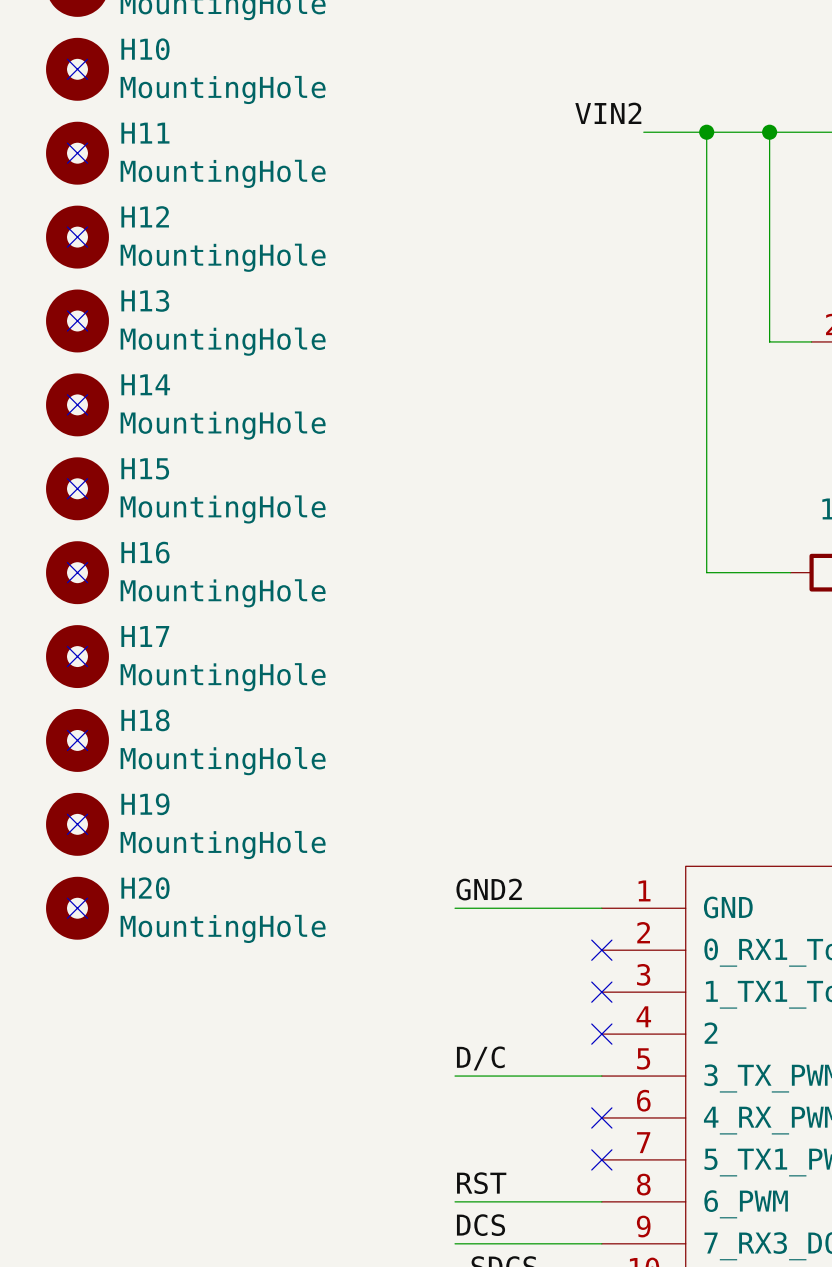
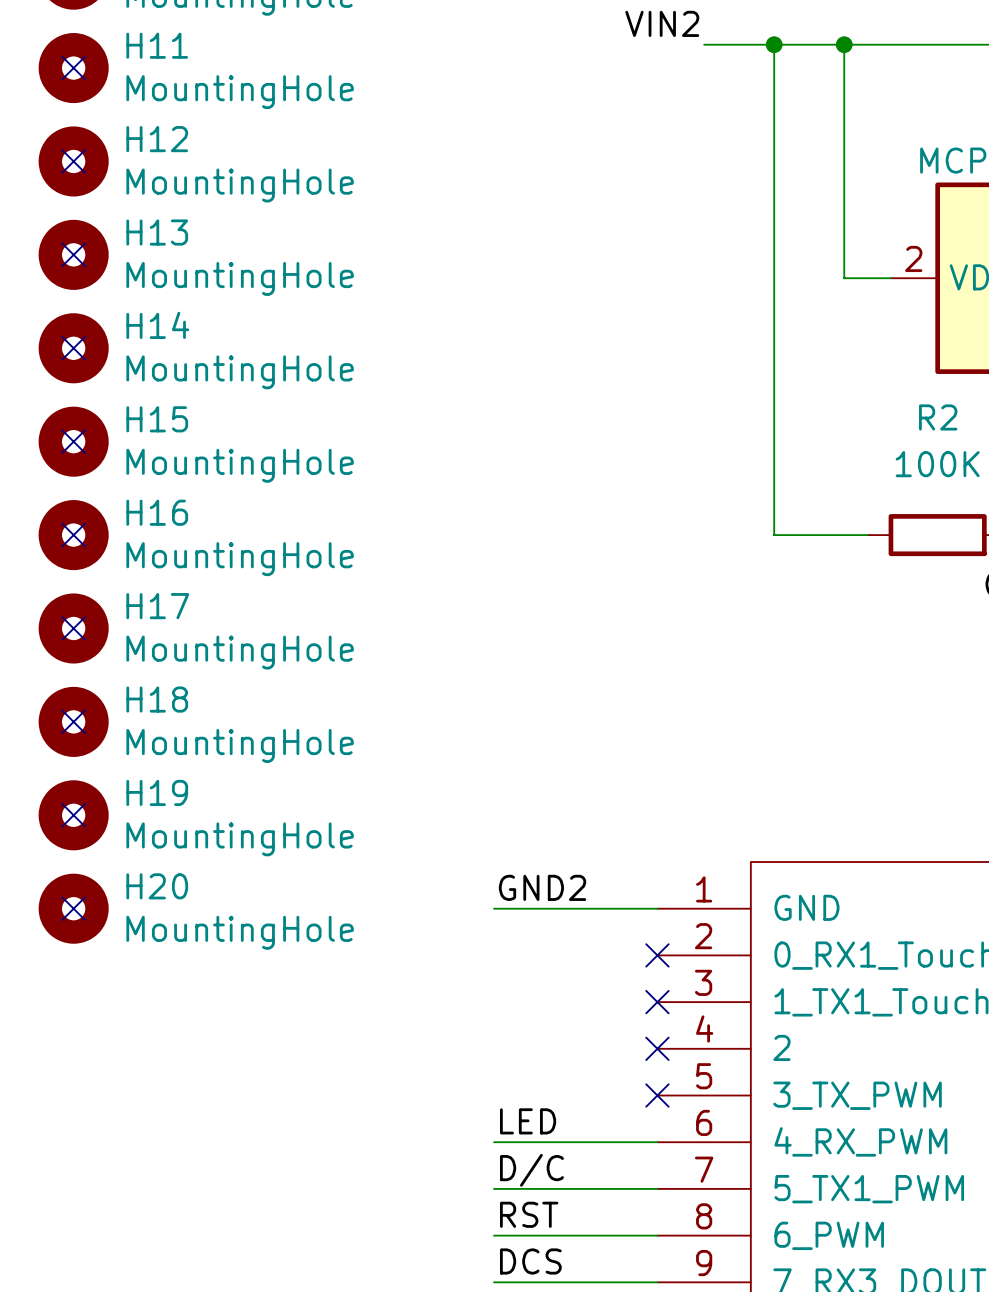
label position: D/C (480, 1058) -> D/C (531, 1170)
wire: (455, 1076) (601, 1076) -> (493, 1142) (657, 1142)
no-connect mark: none -> (657, 1095)
label: none -> LED (528, 1121)
no-connect mark: (601, 1117) -> none
wire: none -> (493, 1188) (657, 1188)
no-connect mark: (601, 1159) -> none

